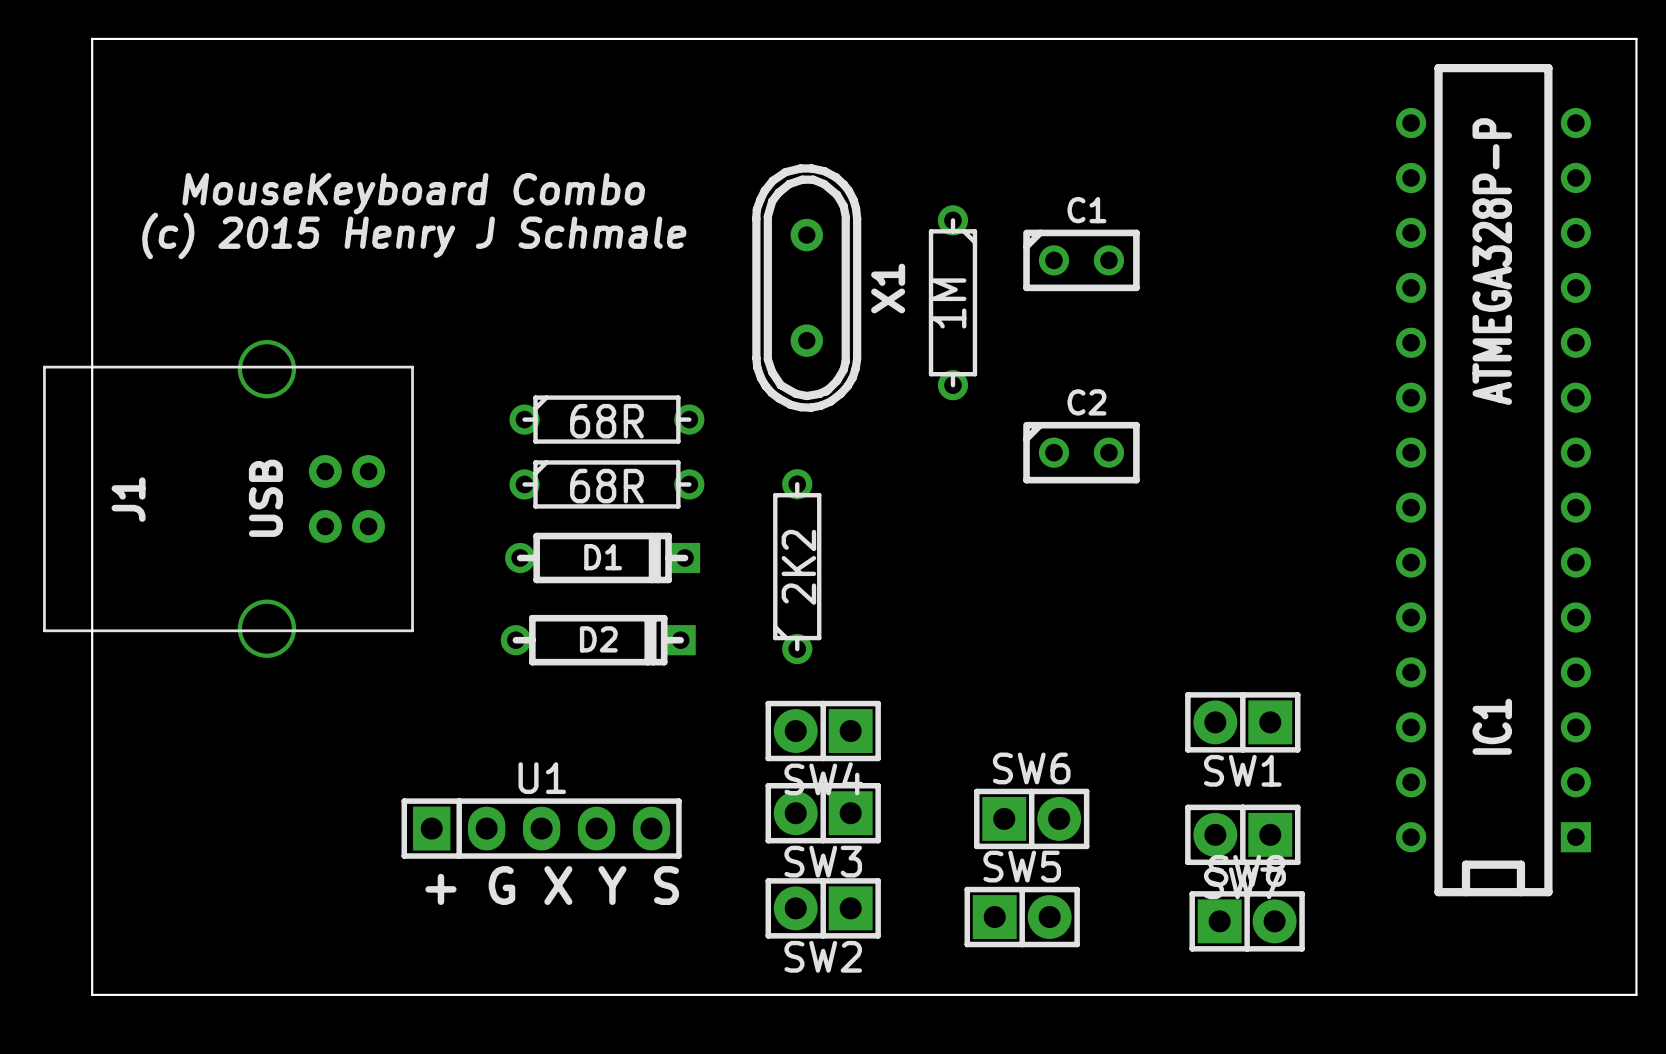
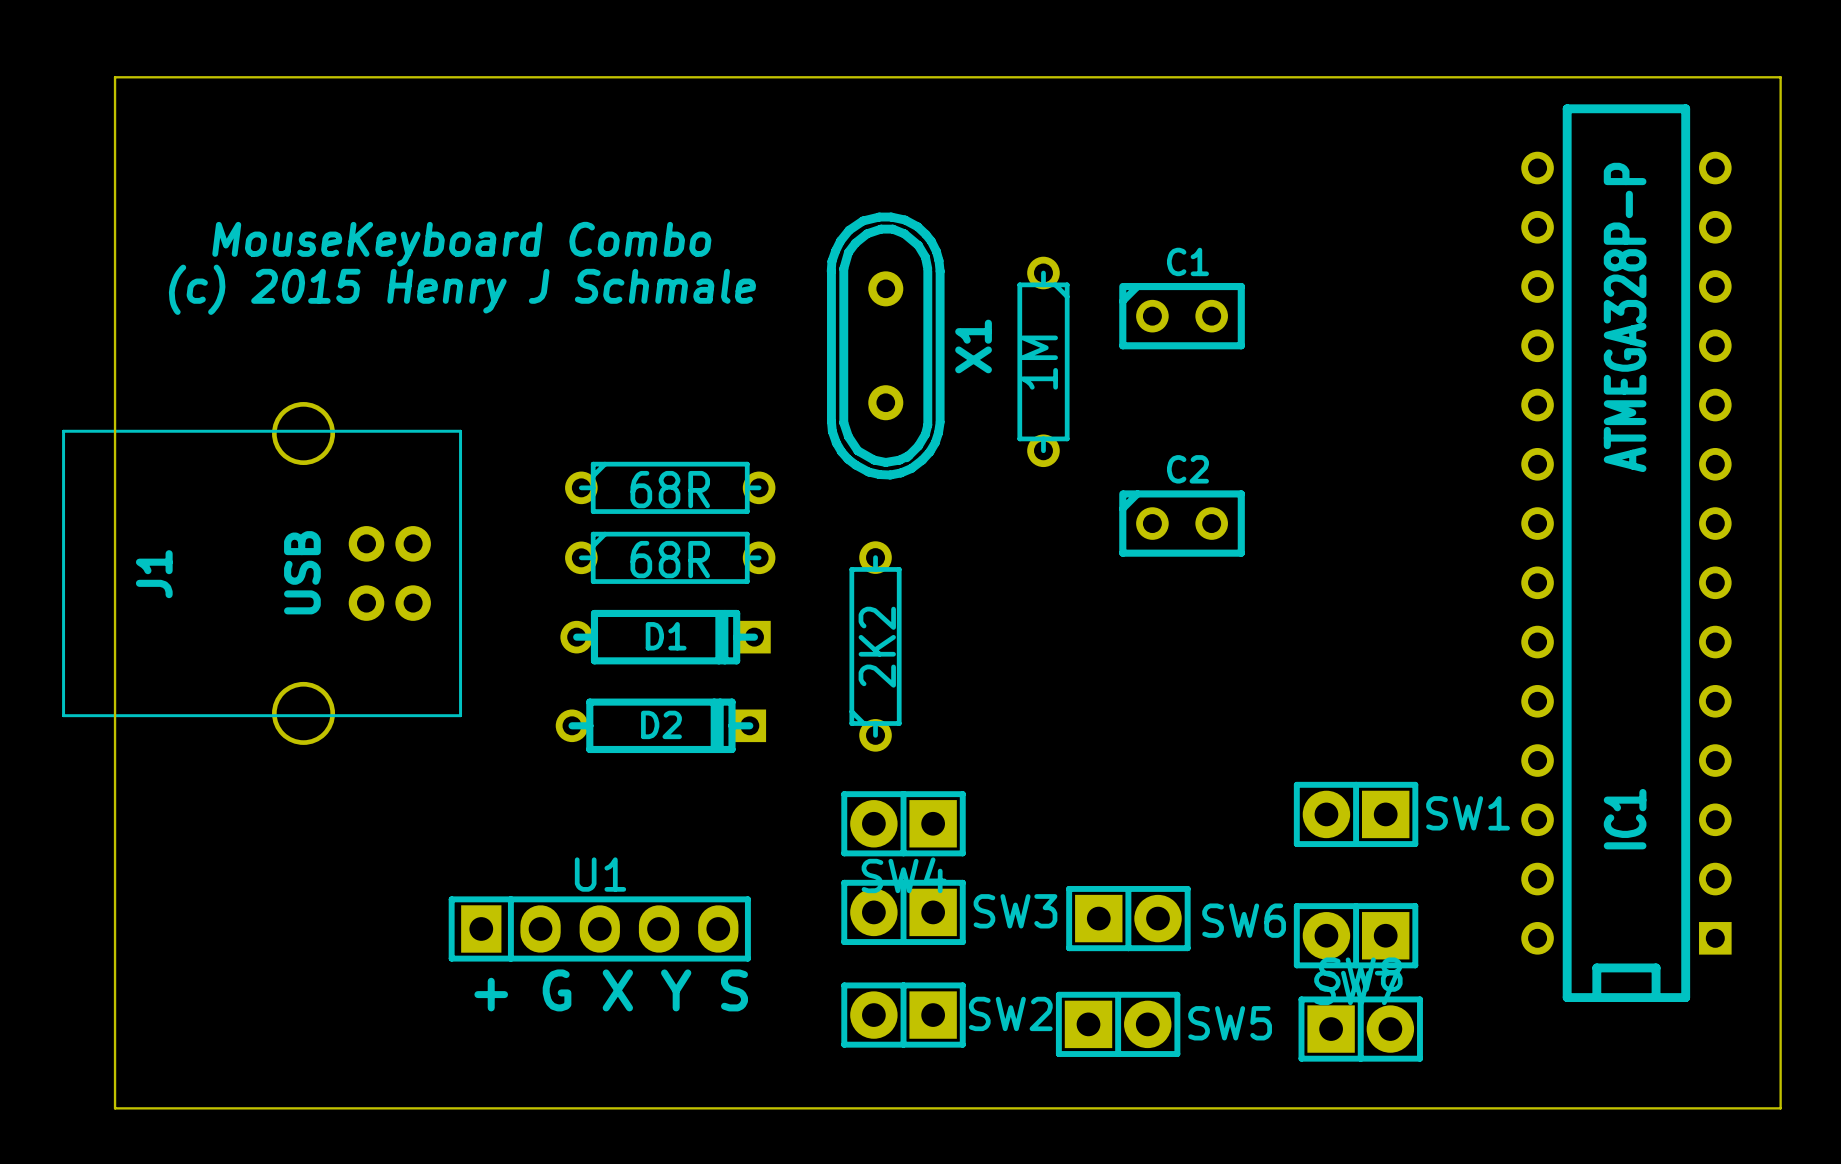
SW6 name position: SW6 (1031, 768) -> SW6 (1244, 920)
SW1 name position: SW1 (1242, 770) -> SW1 (1468, 813)
SW3 name position: SW3 (823, 861) -> SW3 (1015, 911)
SW5 name position: SW5 (1022, 866) -> SW5 (1230, 1023)
SW2 name position: SW2 (823, 956) -> SW2 (1010, 1013)

